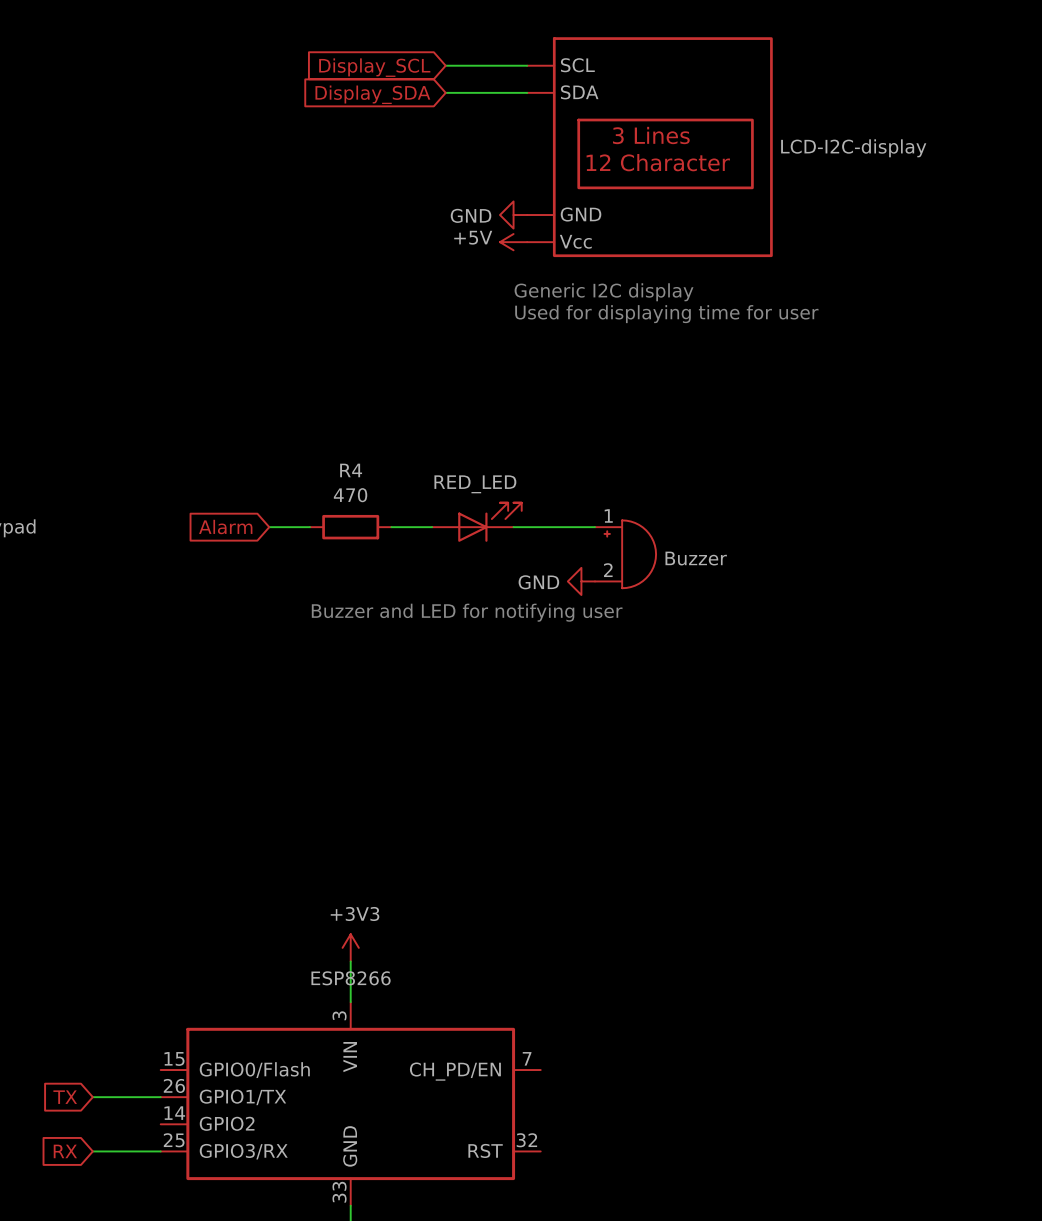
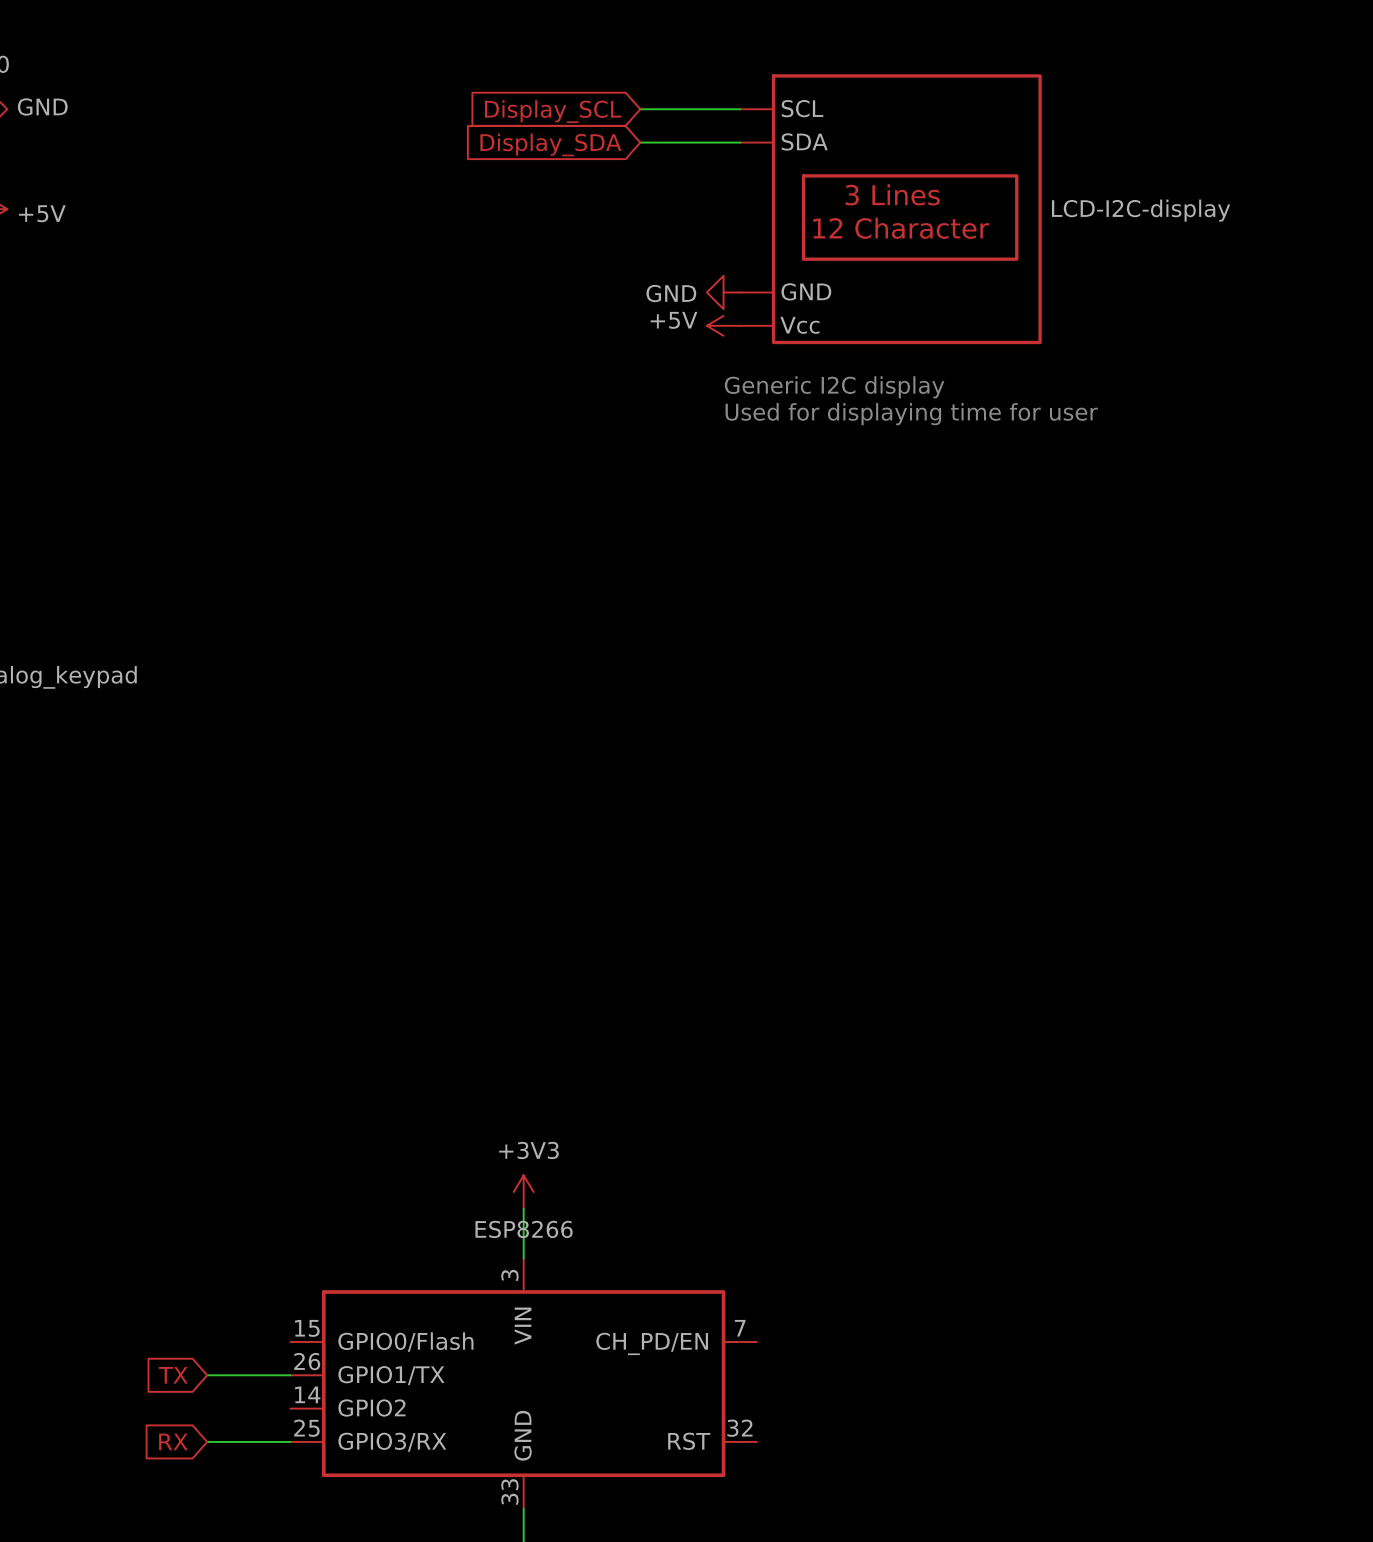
part: RED_LED (476, 522) -> none
global label: Alarm (225, 527) -> none
wire: (269, 527) (309, 527) -> none
R4: 470 (350, 527) -> none
wire: (391, 527) (432, 527) -> none
wire: (513, 527) (595, 527) -> none
part: Buzzer (625, 554) -> none
power symbol: GND (581, 581) -> none
text: Buzzer and LED for notifying user (467, 612) -> none

